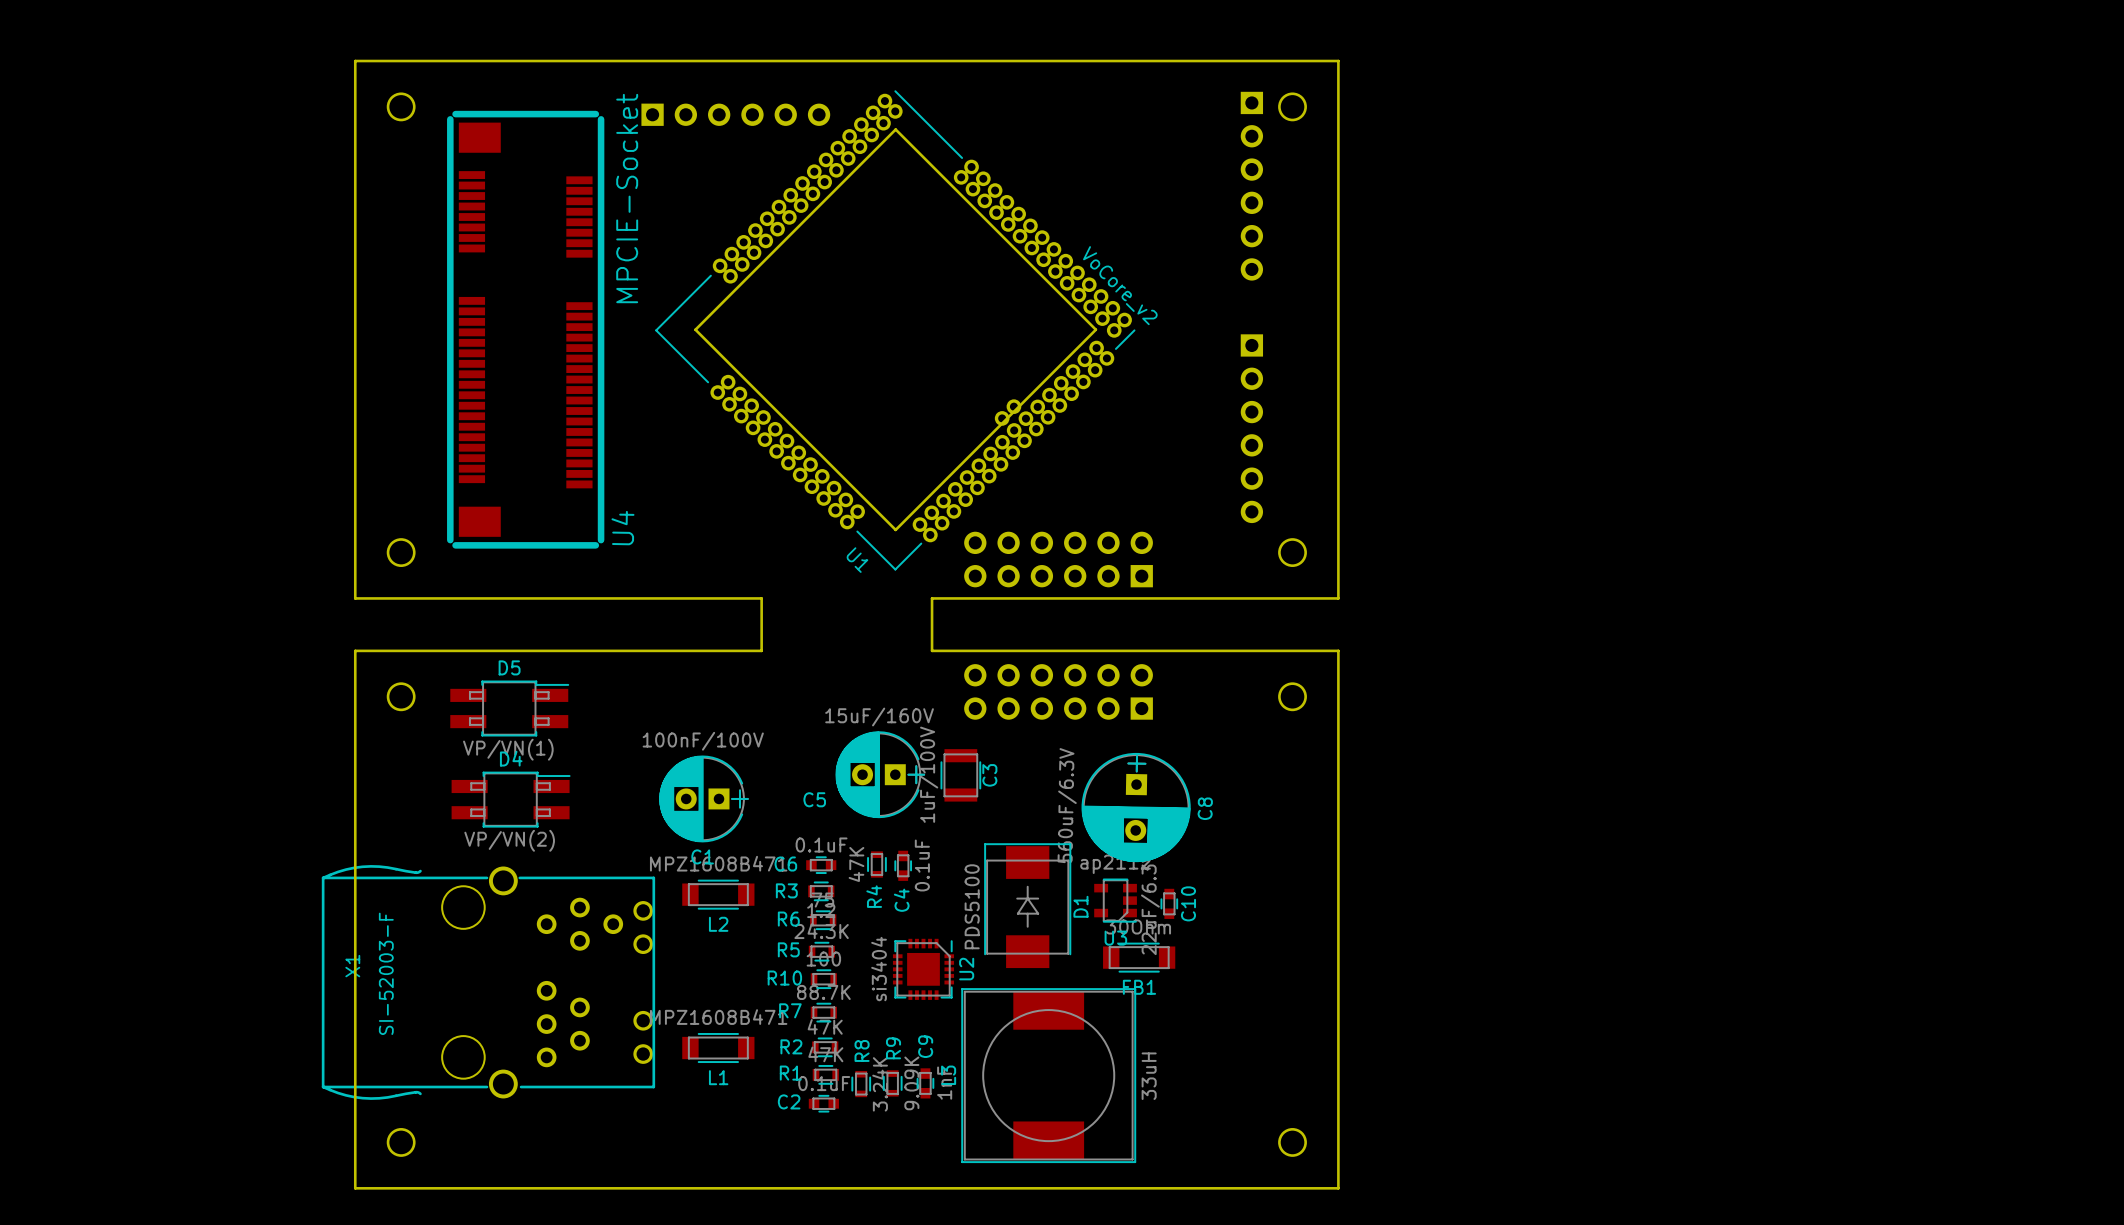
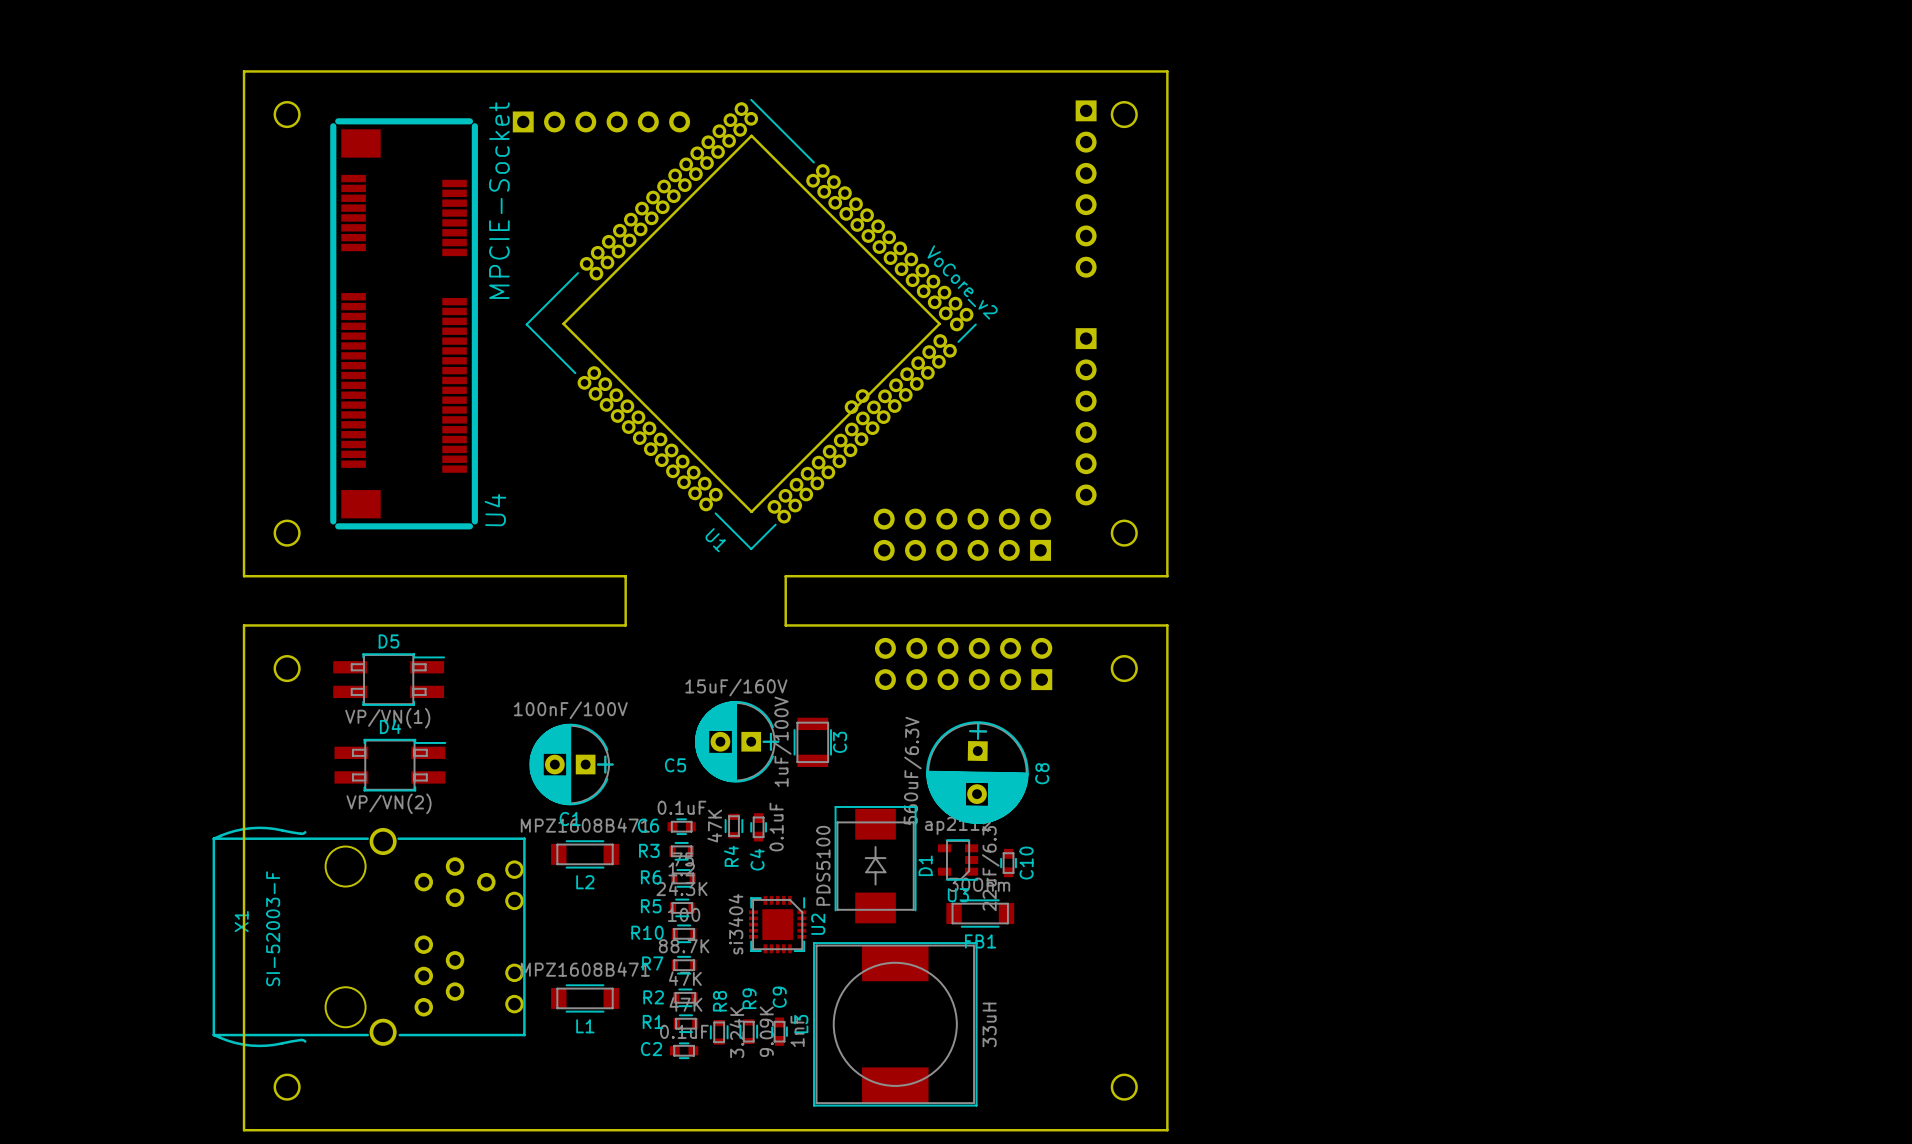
part position: (1058, 559) -> (962, 534)
part position: (1058, 691) -> (963, 663)

